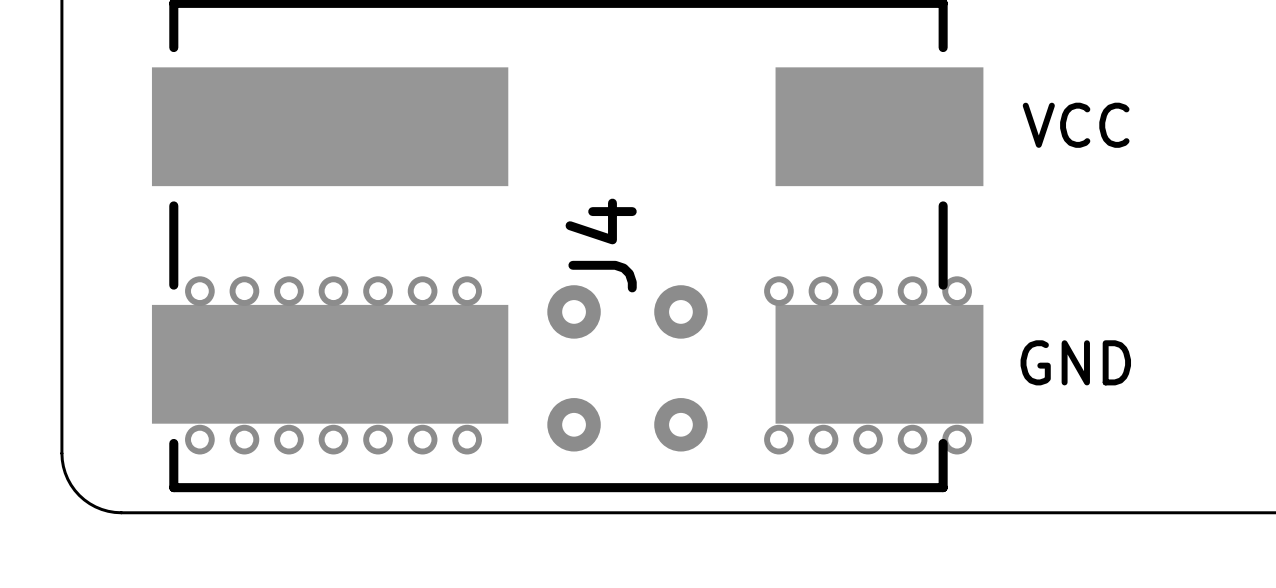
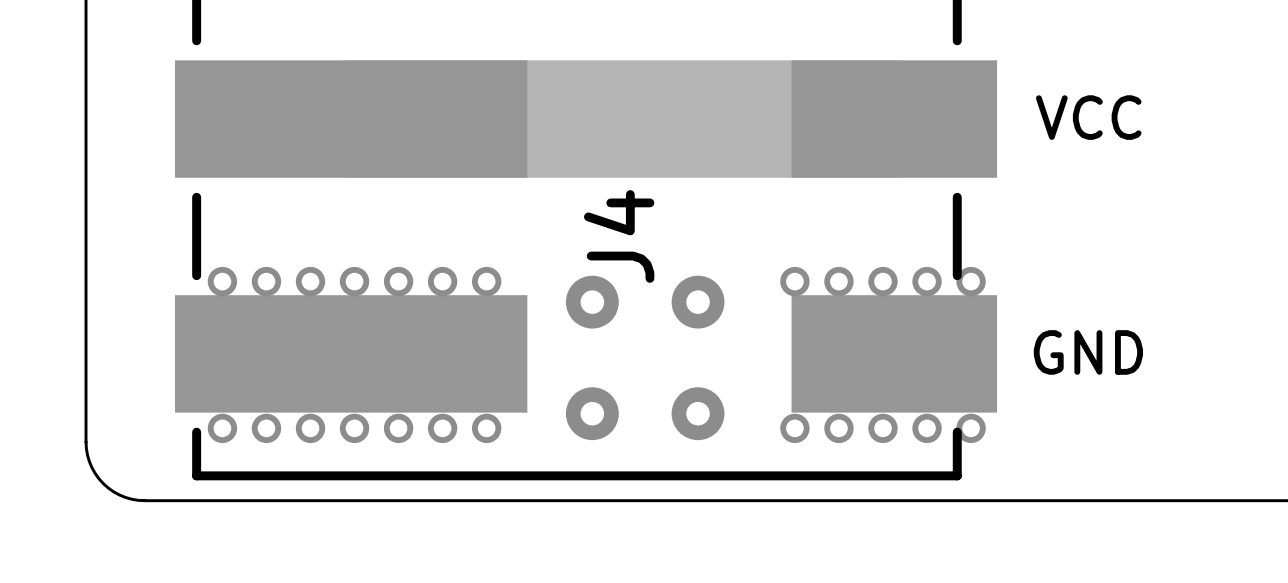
track: none -> (351, 119) (894, 119)

